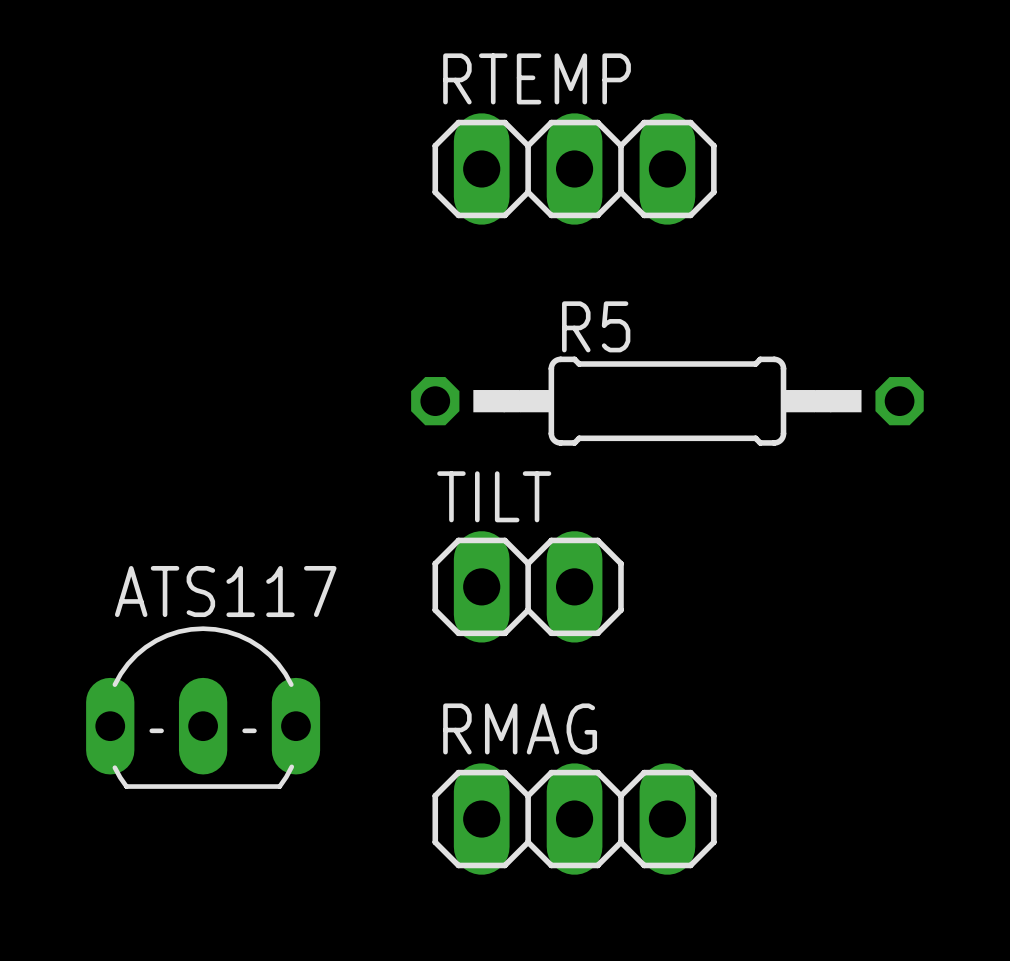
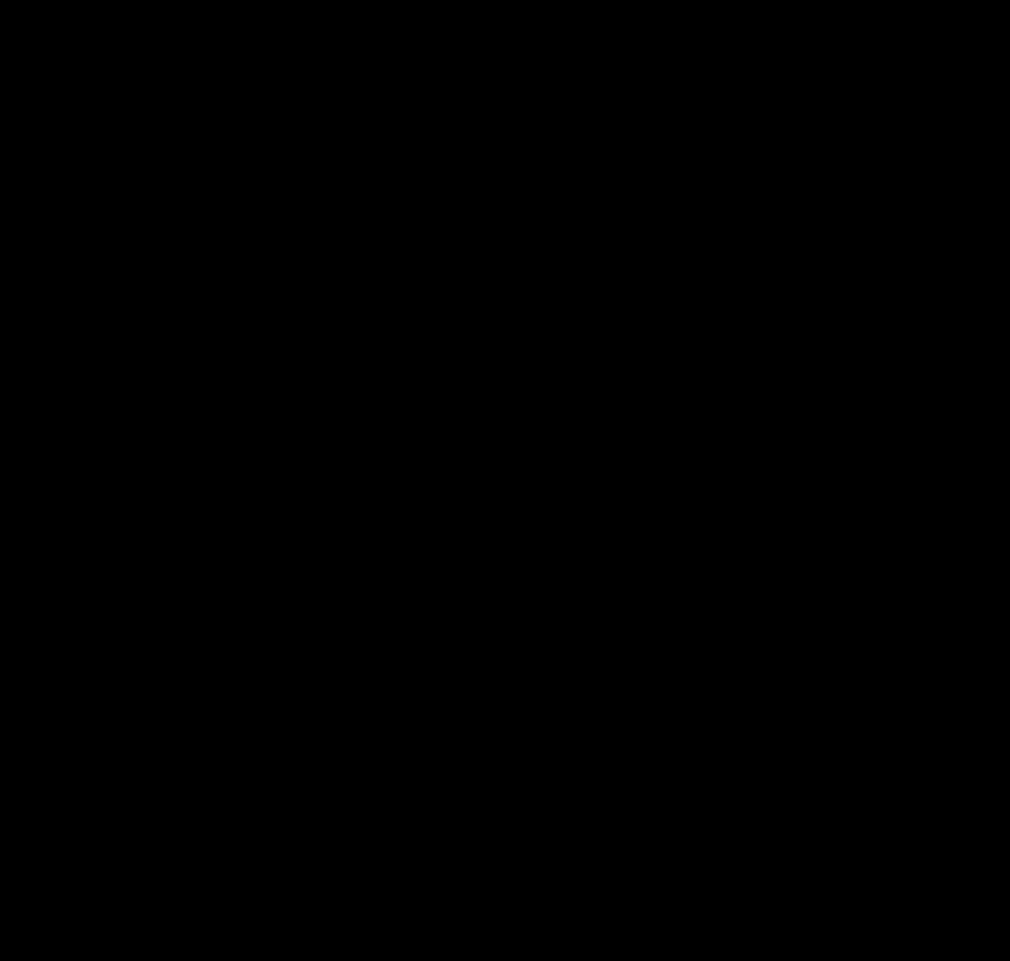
RTEMP: (574, 168) -> none
R5: (667, 401) -> none
TILT: (528, 586) -> none
ATS117: (203, 707) -> none
RMAG: (574, 819) -> none

